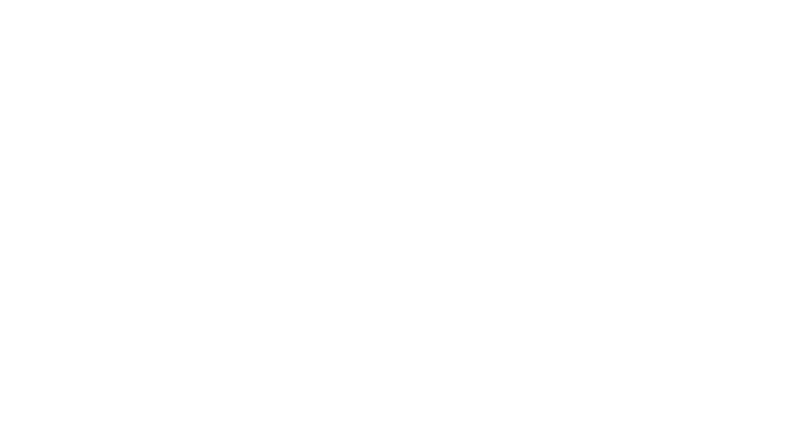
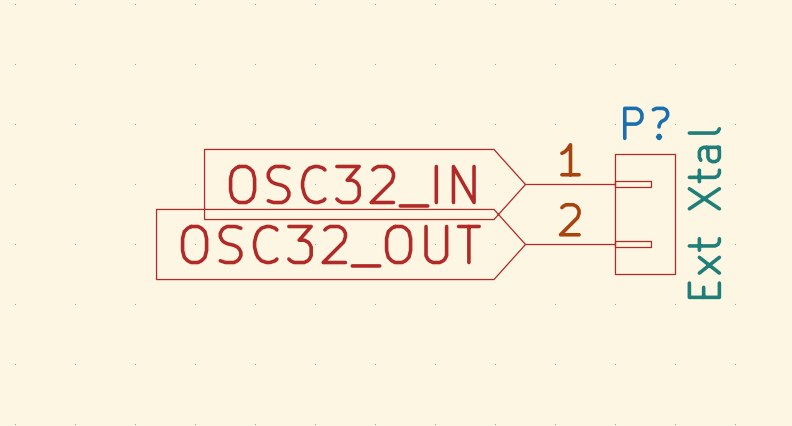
global label: none -> OSC32_IN (352, 186)
P?: none -> Ext Xtal (600, 214)
global label: none -> OSC32_OUT (330, 246)

